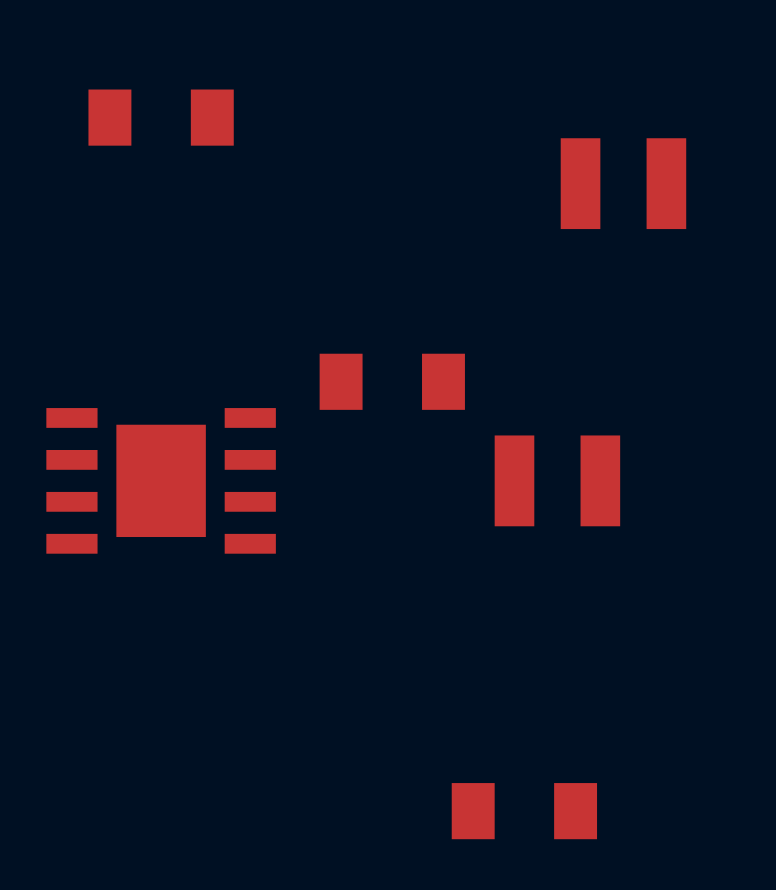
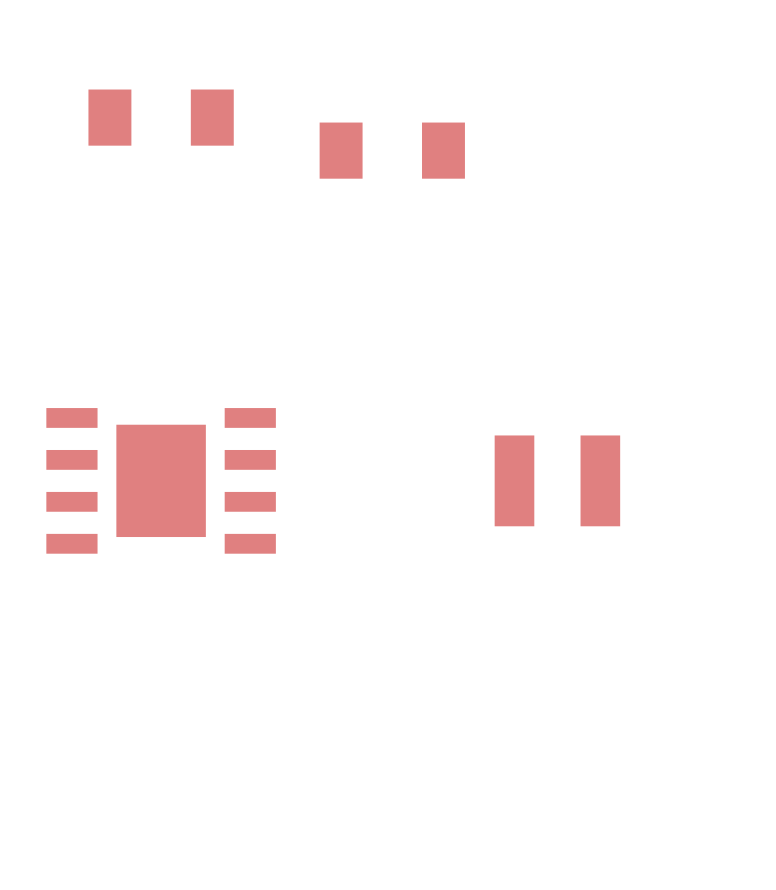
part: (623, 183) -> none
part position: (392, 381) -> (392, 150)
part: (524, 811) -> none

